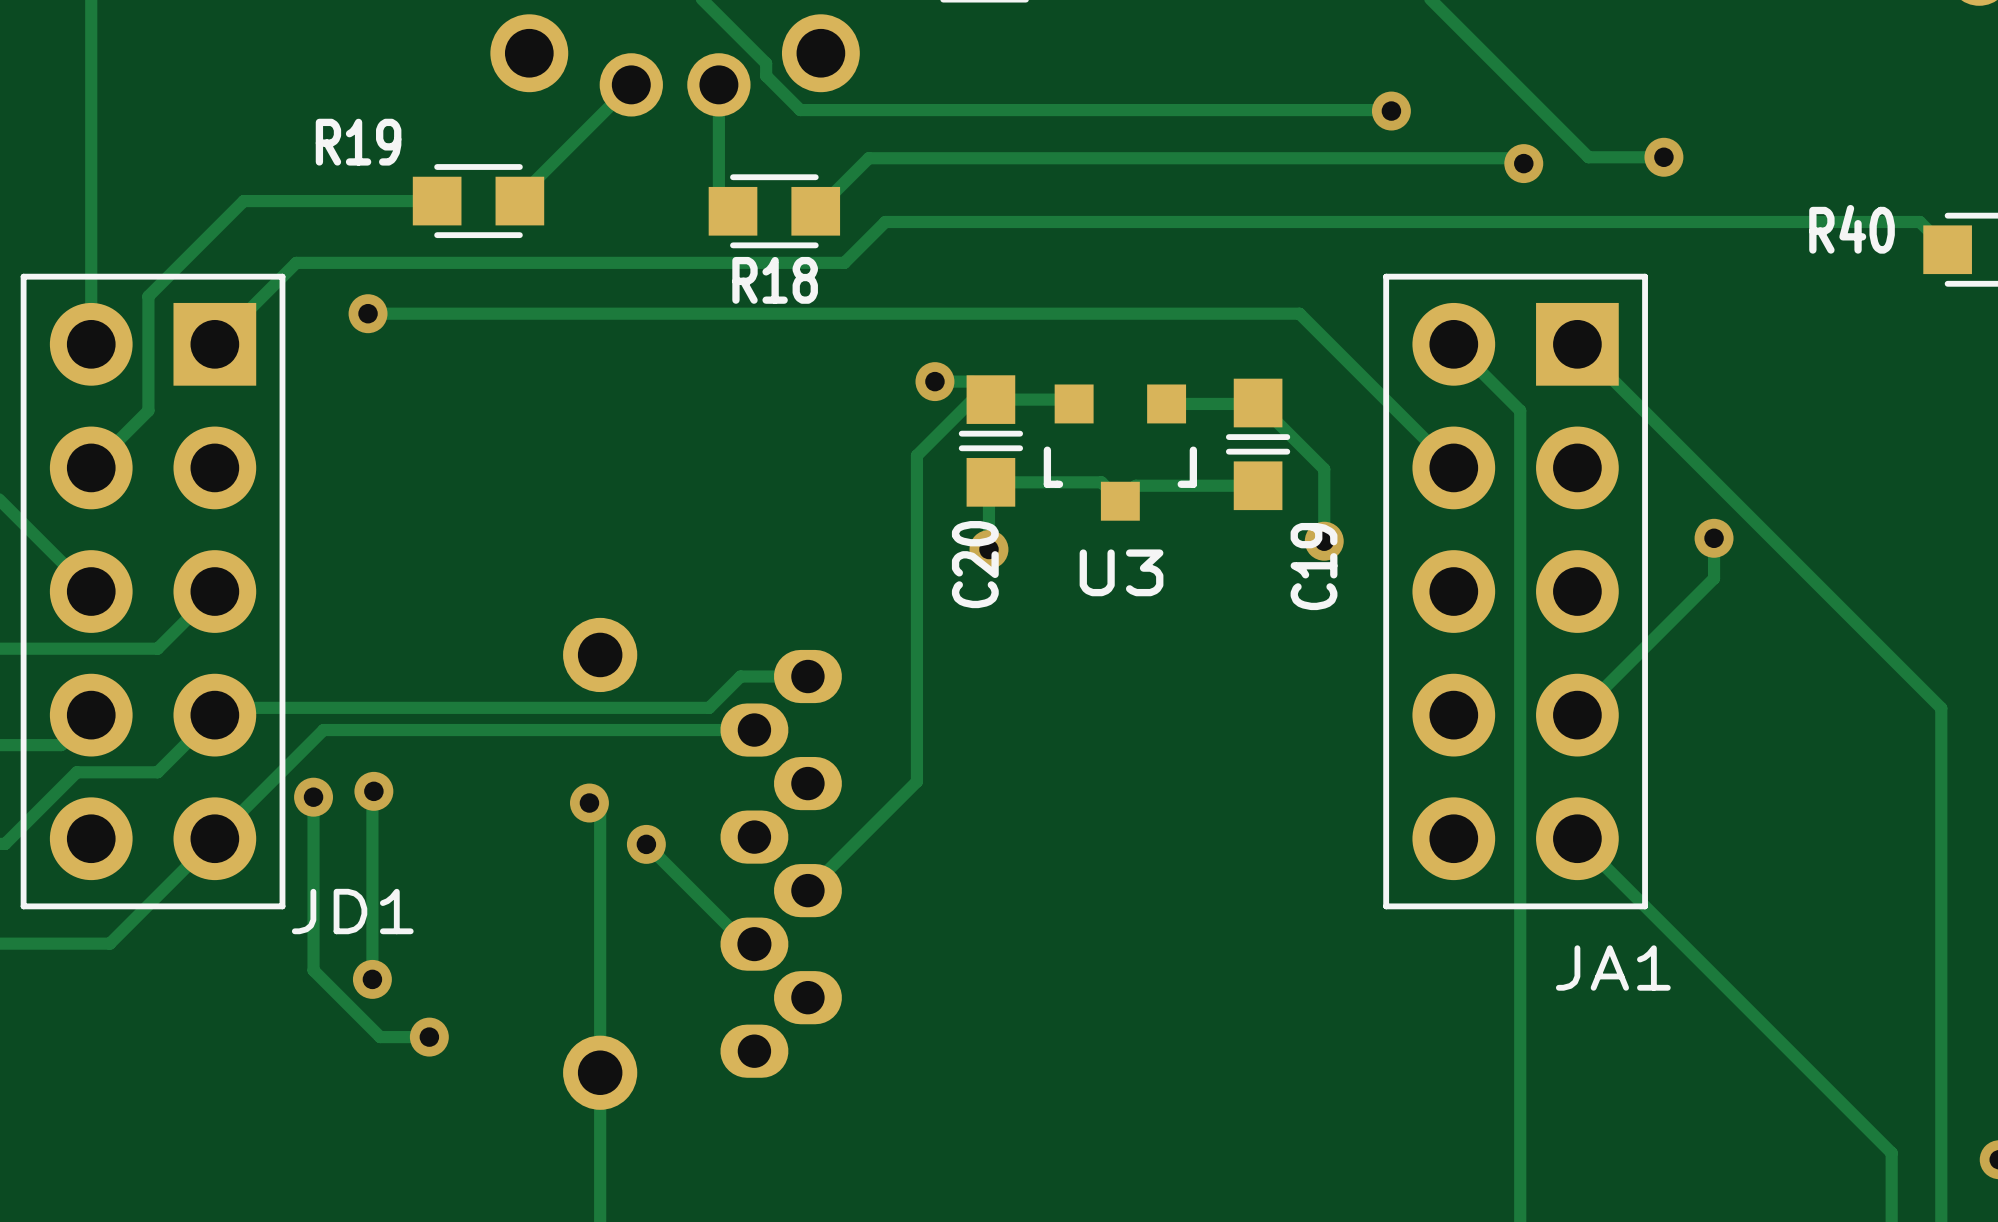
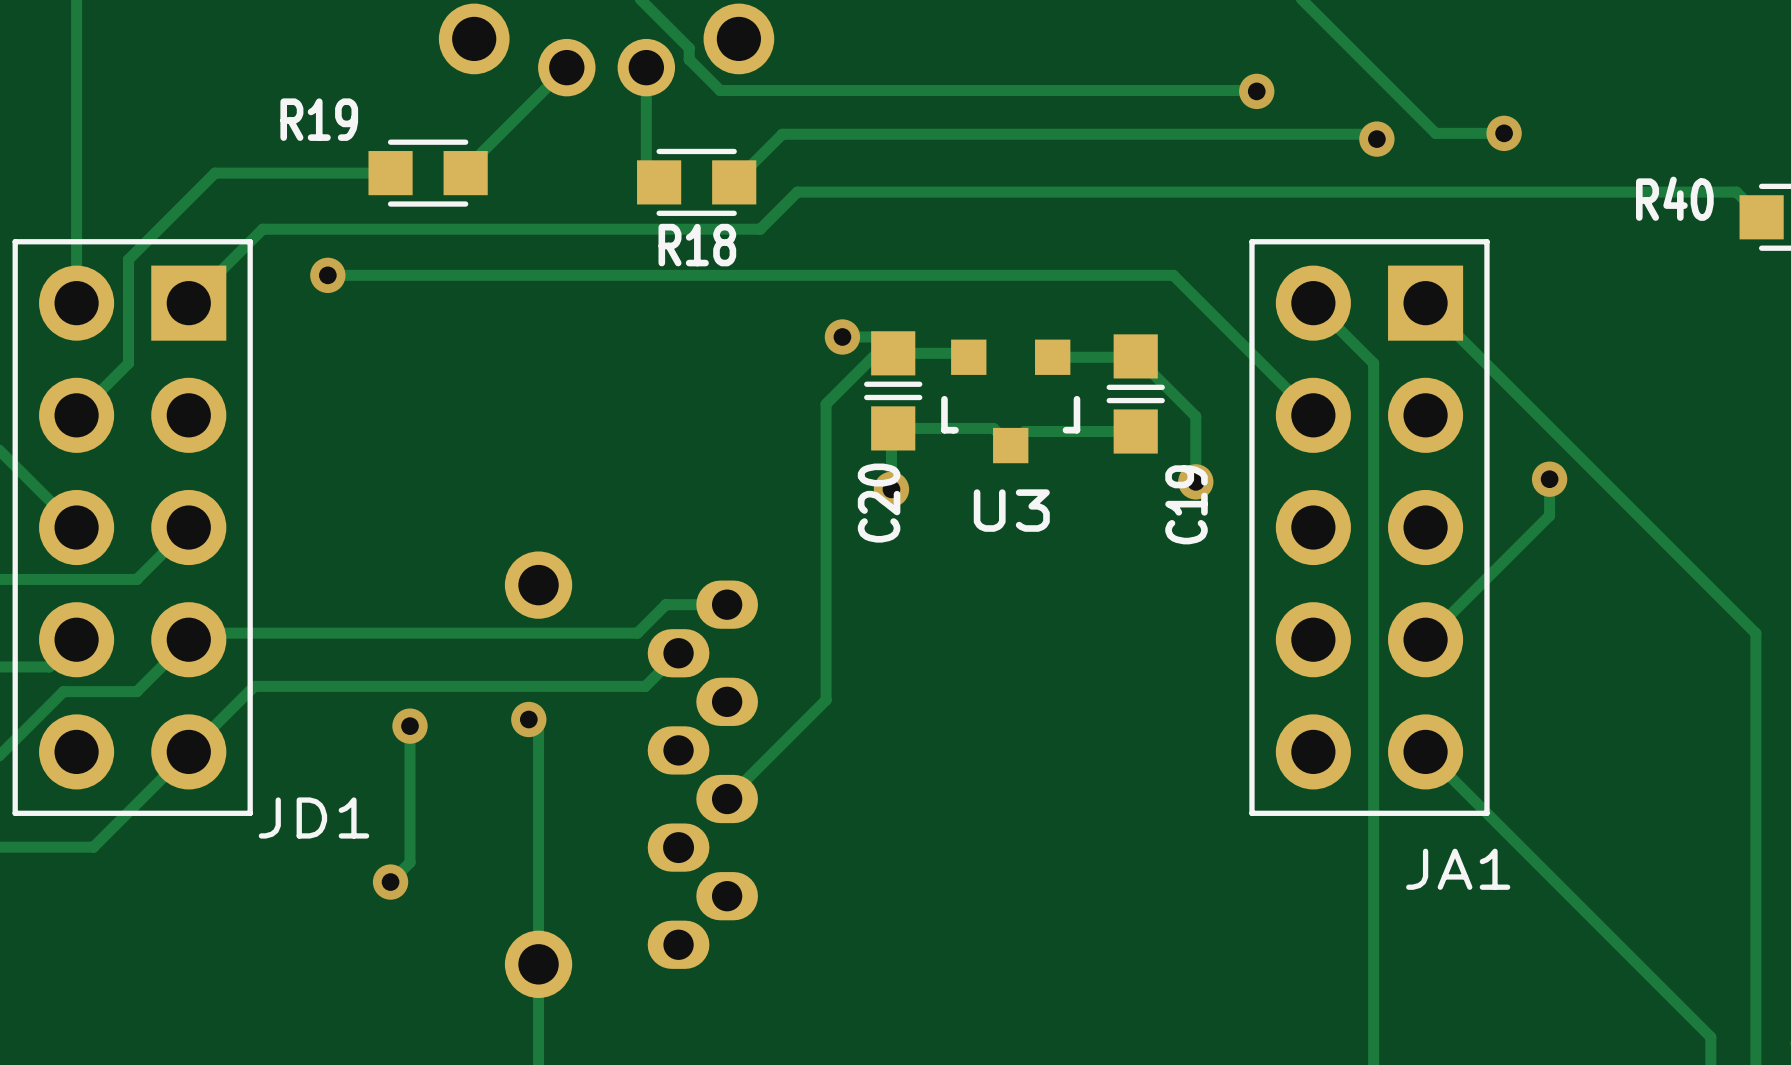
track: (754, 730) (323, 730) (287, 766) -> (678, 653) (645, 686) (254, 686)
track: (373, 791) (372, 979) -> none
via: (373, 791) -> none
track: (313, 797) (313, 970) (380, 1037) (429, 1037) -> none
via: (313, 797) -> none
track: none -> (409, 726) (409, 862) (390, 882)
via: none -> (409, 726)
track: (646, 844) (746, 944) -> none
via: (646, 844) -> none
via: (372, 979) -> none
via: none -> (390, 882)
via: (429, 1037) -> none

